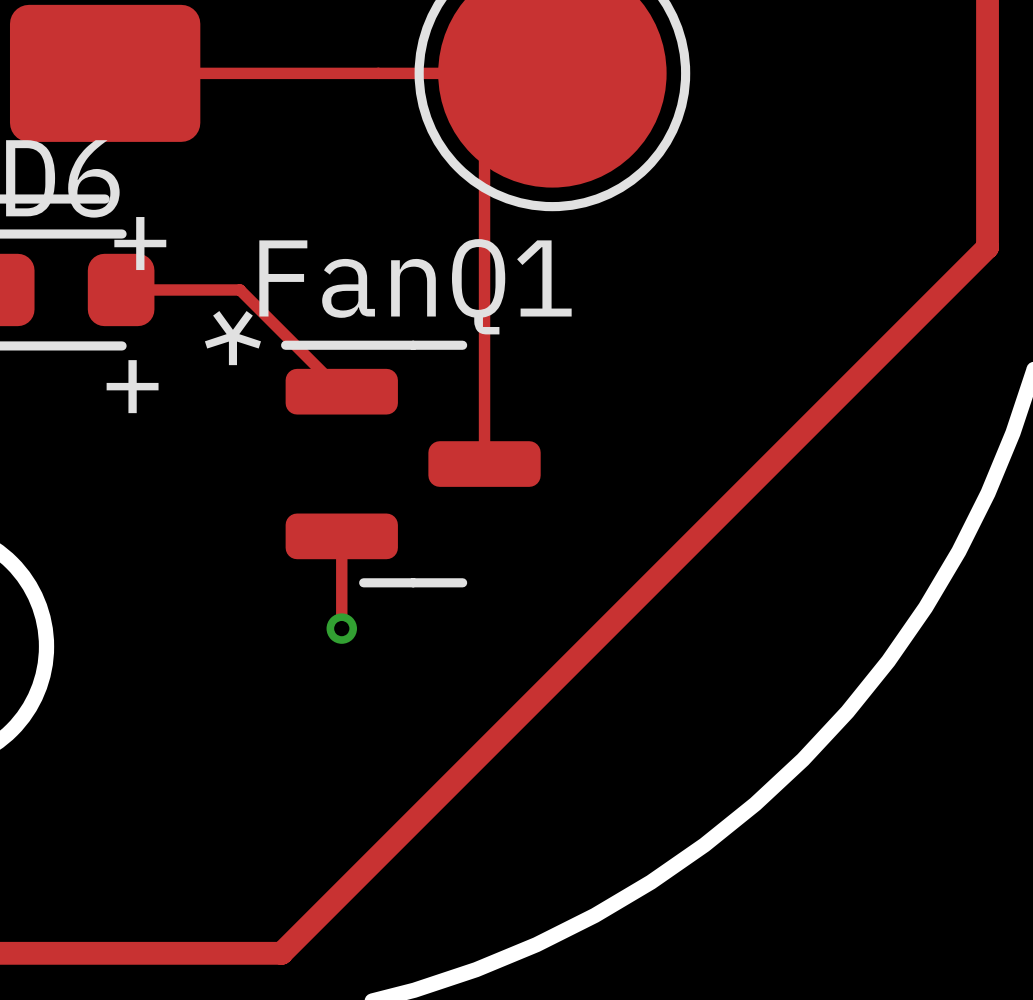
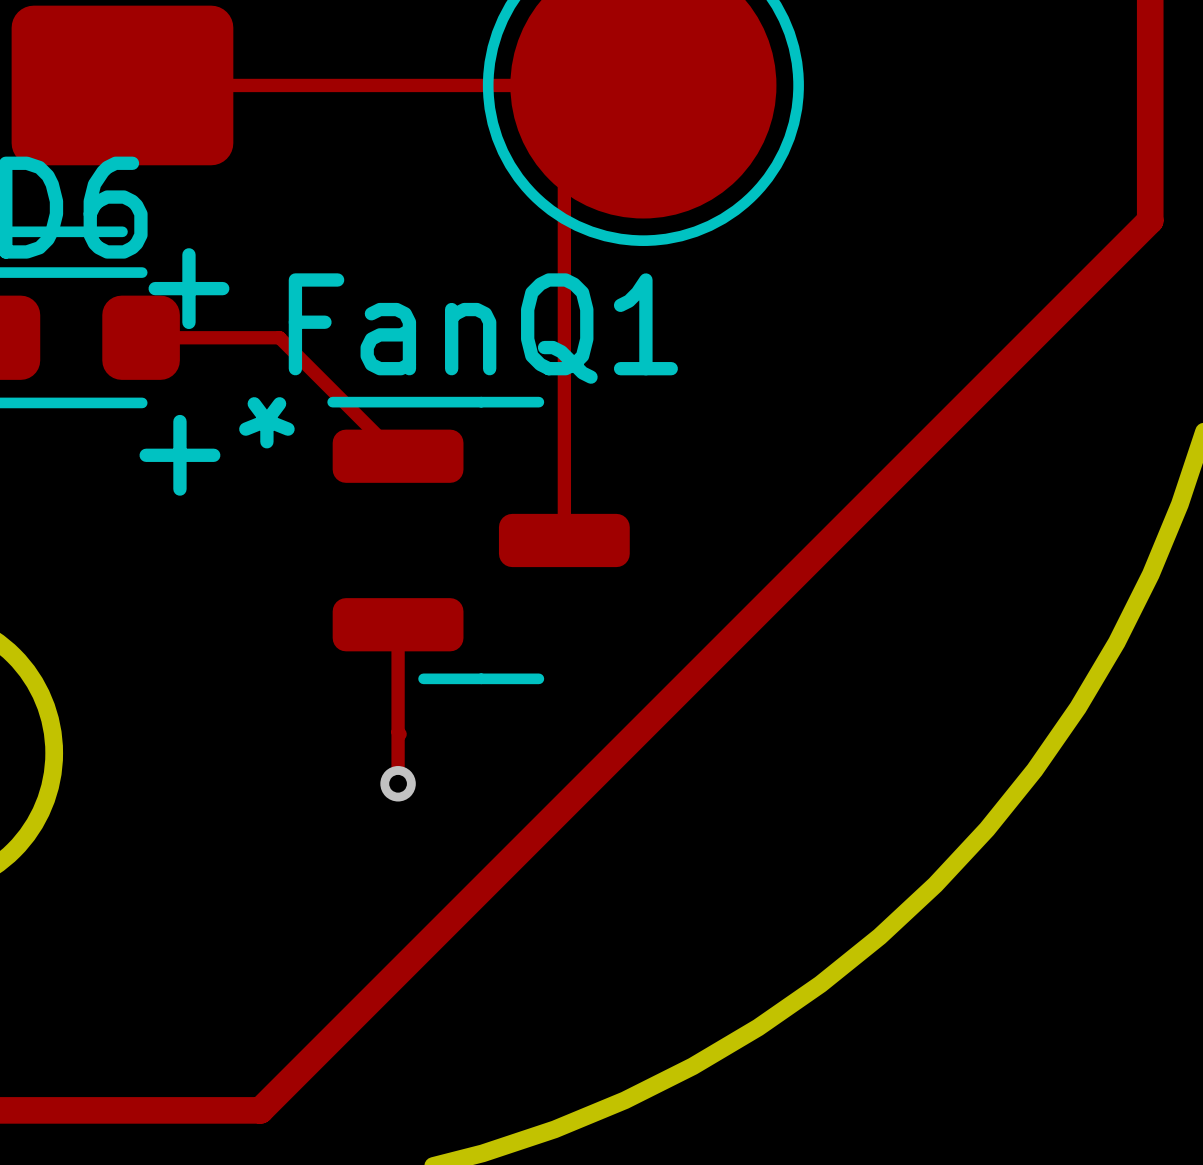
top track: (987, 189) (987, 247) (281, 953) (223, 953) -> (1150, 220) (260, 1110)
top track: none -> (398, 732) (398, 783)
via position: (341, 628) -> (398, 783)

